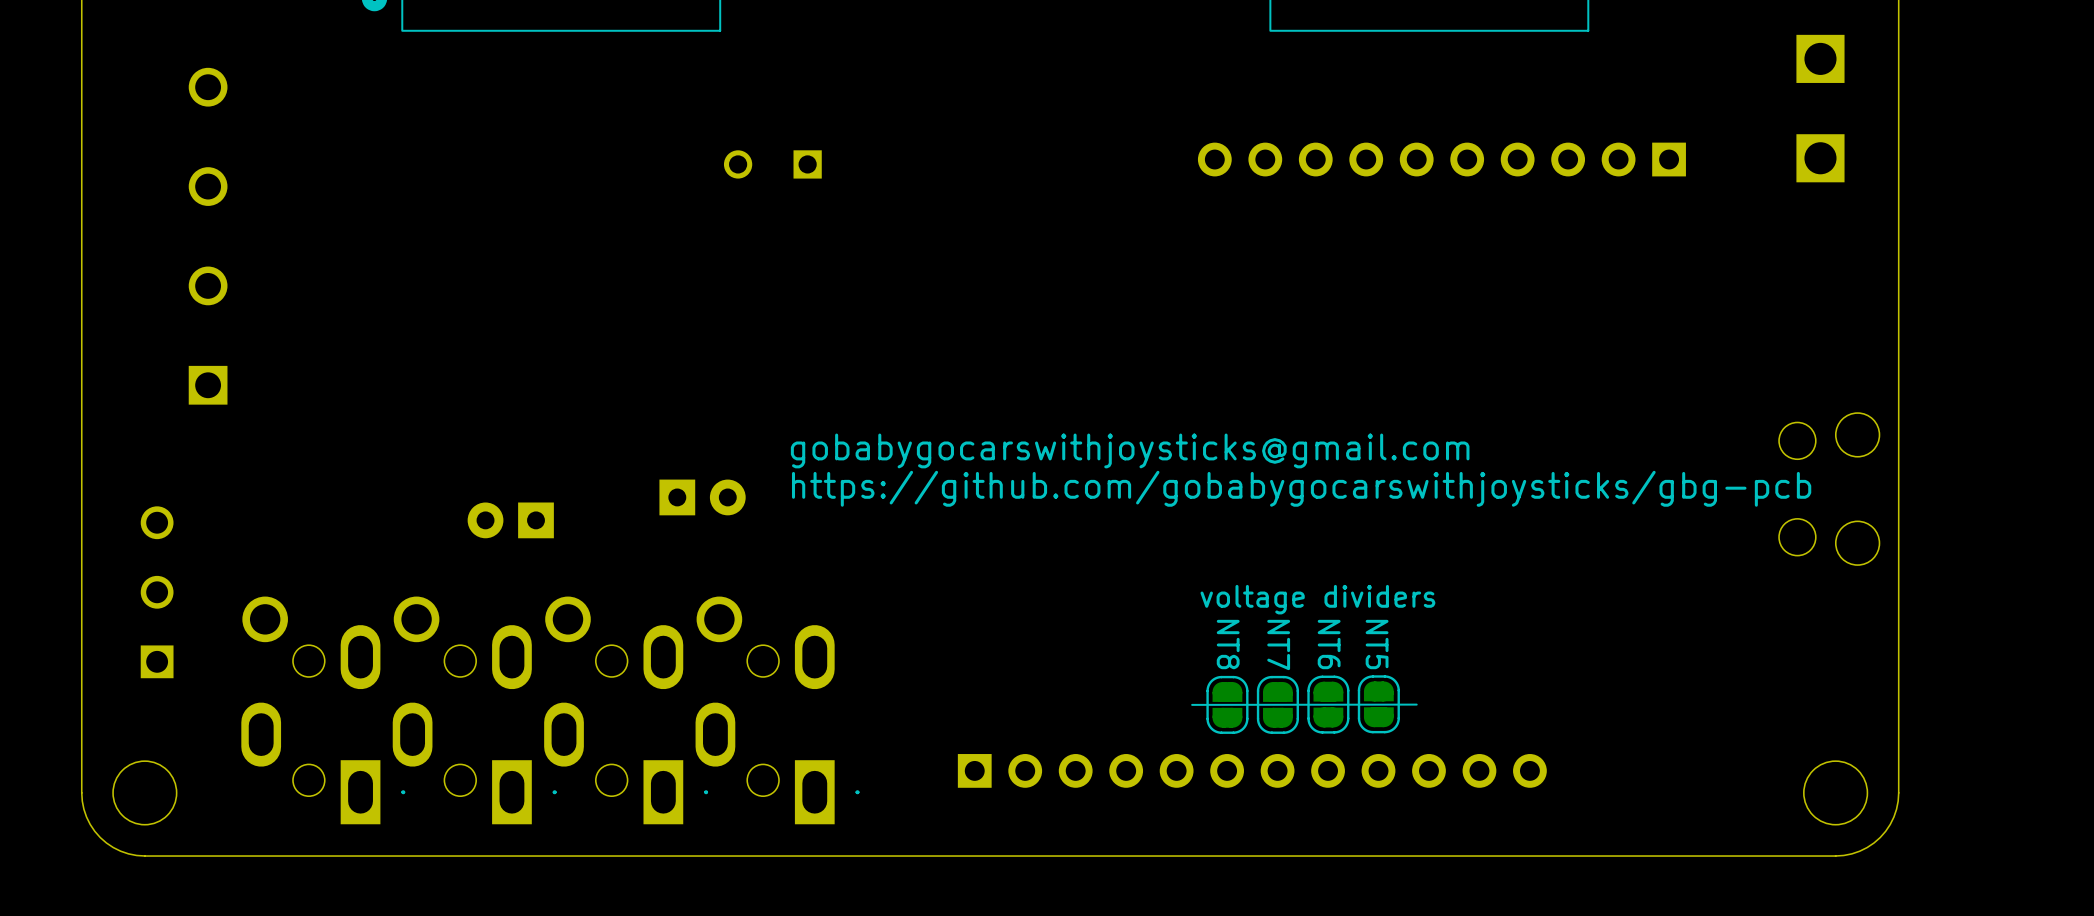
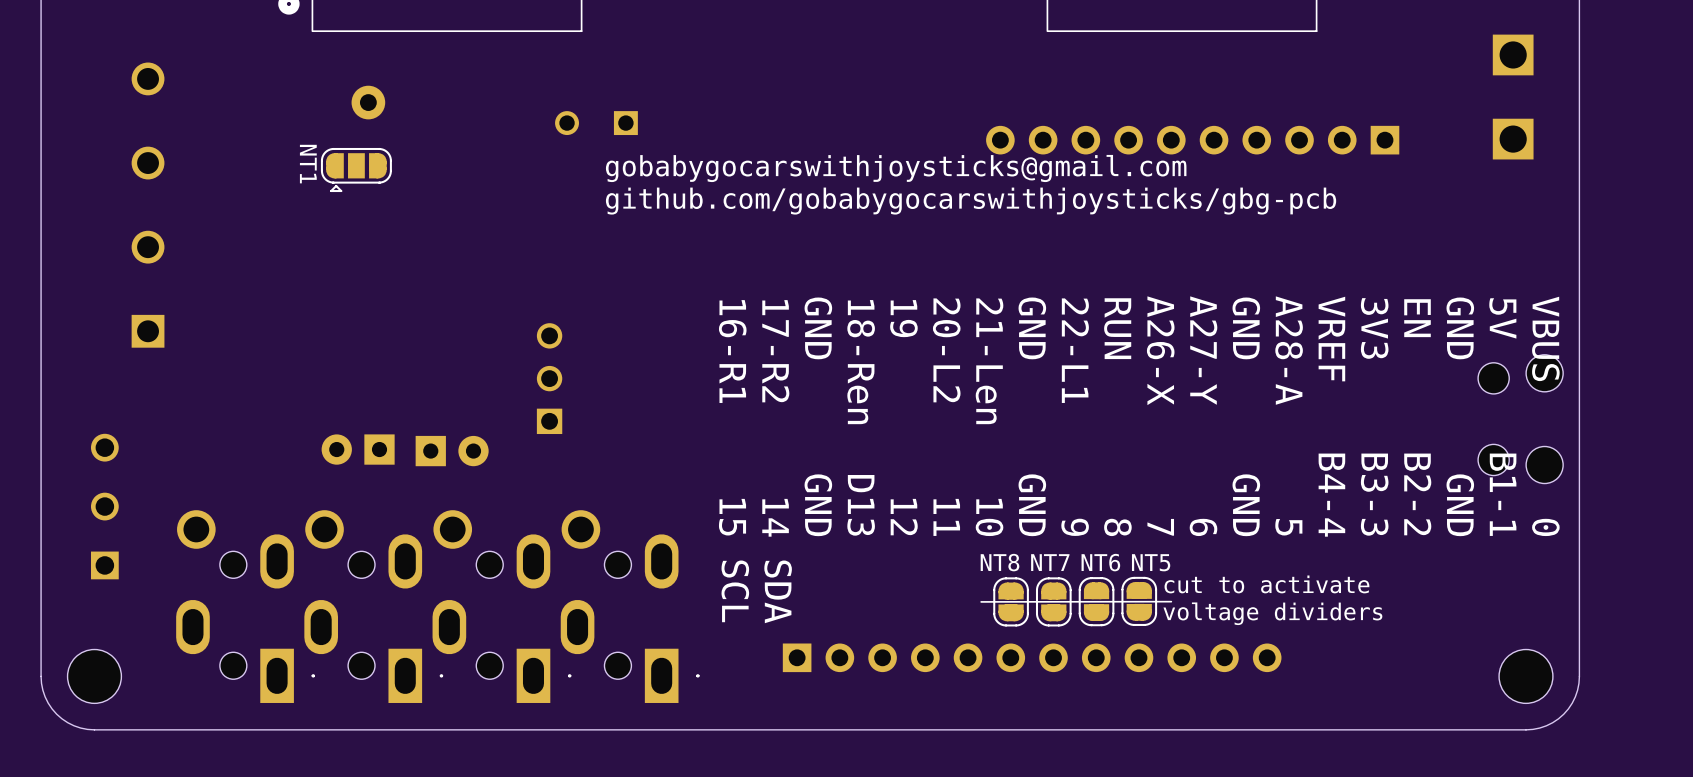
part: none -> (368, 102)
part position: (772, 164) -> (596, 123)
NT1: none -> (356, 170)
text: none -> github.com/gobabygocarswithjoysticks/gbg-pcb (971, 201)
text: none -> 19 (903, 318)
text: none -> 5V (1502, 318)
text: none -> EN (1417, 318)
text: none -> 3V3 (1374, 328)
text: none -> GND (818, 328)
text: none -> GND (1032, 328)
text: none -> GND (1246, 328)
text: none -> GND (1460, 328)
text: none -> RUN (1117, 328)
text: none -> VREF (1331, 339)
text: none -> VBUS (1545, 338)
text: none -> 20-L2 (946, 350)
text: none -> 22-L1 (1075, 350)
text: none -> A26-X (1160, 350)
text: none -> A27-Y (1203, 350)
text: none -> A28-A (1289, 350)
text: none -> 16-R1 (732, 351)
text: none -> 17-R2 (775, 351)
text: none -> 21-Len (989, 361)
text: none -> 18-Ren (861, 362)
part: none -> (549, 378)
text position: gobabygocarswithjoysticks@gmail.com (1130, 450) -> gobabygocarswithjoysticks@gmail.com (896, 168)
text: https://github.com/gobabygocarswithjoysticks/gbg-pcb (1301, 488) -> none
part: (702, 497) -> none
part: (510, 520) -> none
part: none -> (358, 449)
part: none -> (452, 451)
text: none -> B4-4 (1331, 495)
text: none -> B3-3 (1374, 494)
text: none -> B2-2 (1417, 494)
text: none -> B1-1 (1503, 494)
text: none -> GND (818, 505)
text: none -> GND (1032, 505)
text: none -> GND (1246, 505)
text: none -> GND (1460, 505)
text: none -> D13 (861, 505)
text: none -> 15 (732, 517)
text: none -> 12 (904, 517)
text: none -> 11 (946, 517)
text: none -> 10 (989, 517)
text: none -> 14 (775, 517)
text position: voltage dividers (1317, 599) -> voltage dividers (1272, 613)
text: none -> 9 (1075, 527)
text: none -> 8 (1117, 527)
text: none -> 7 (1160, 527)
text: none -> 6 (1203, 527)
text: none -> 5 (1288, 527)
text: none -> 0 (1545, 527)
NT8 name rotation: 0° (1228, 644) -> 90° counterclockwise (1000, 562)
NT7 name rotation: 0° (1278, 644) -> 90° counterclockwise (1050, 562)
NT6 name rotation: 0° (1329, 644) -> 90° counterclockwise (1100, 562)
NT5 name rotation: 0° (1377, 644) -> 90° counterclockwise (1151, 562)
text: none -> cut to activate (1266, 584)
text: none -> SDA (778, 591)
text: none -> SCL (735, 591)

